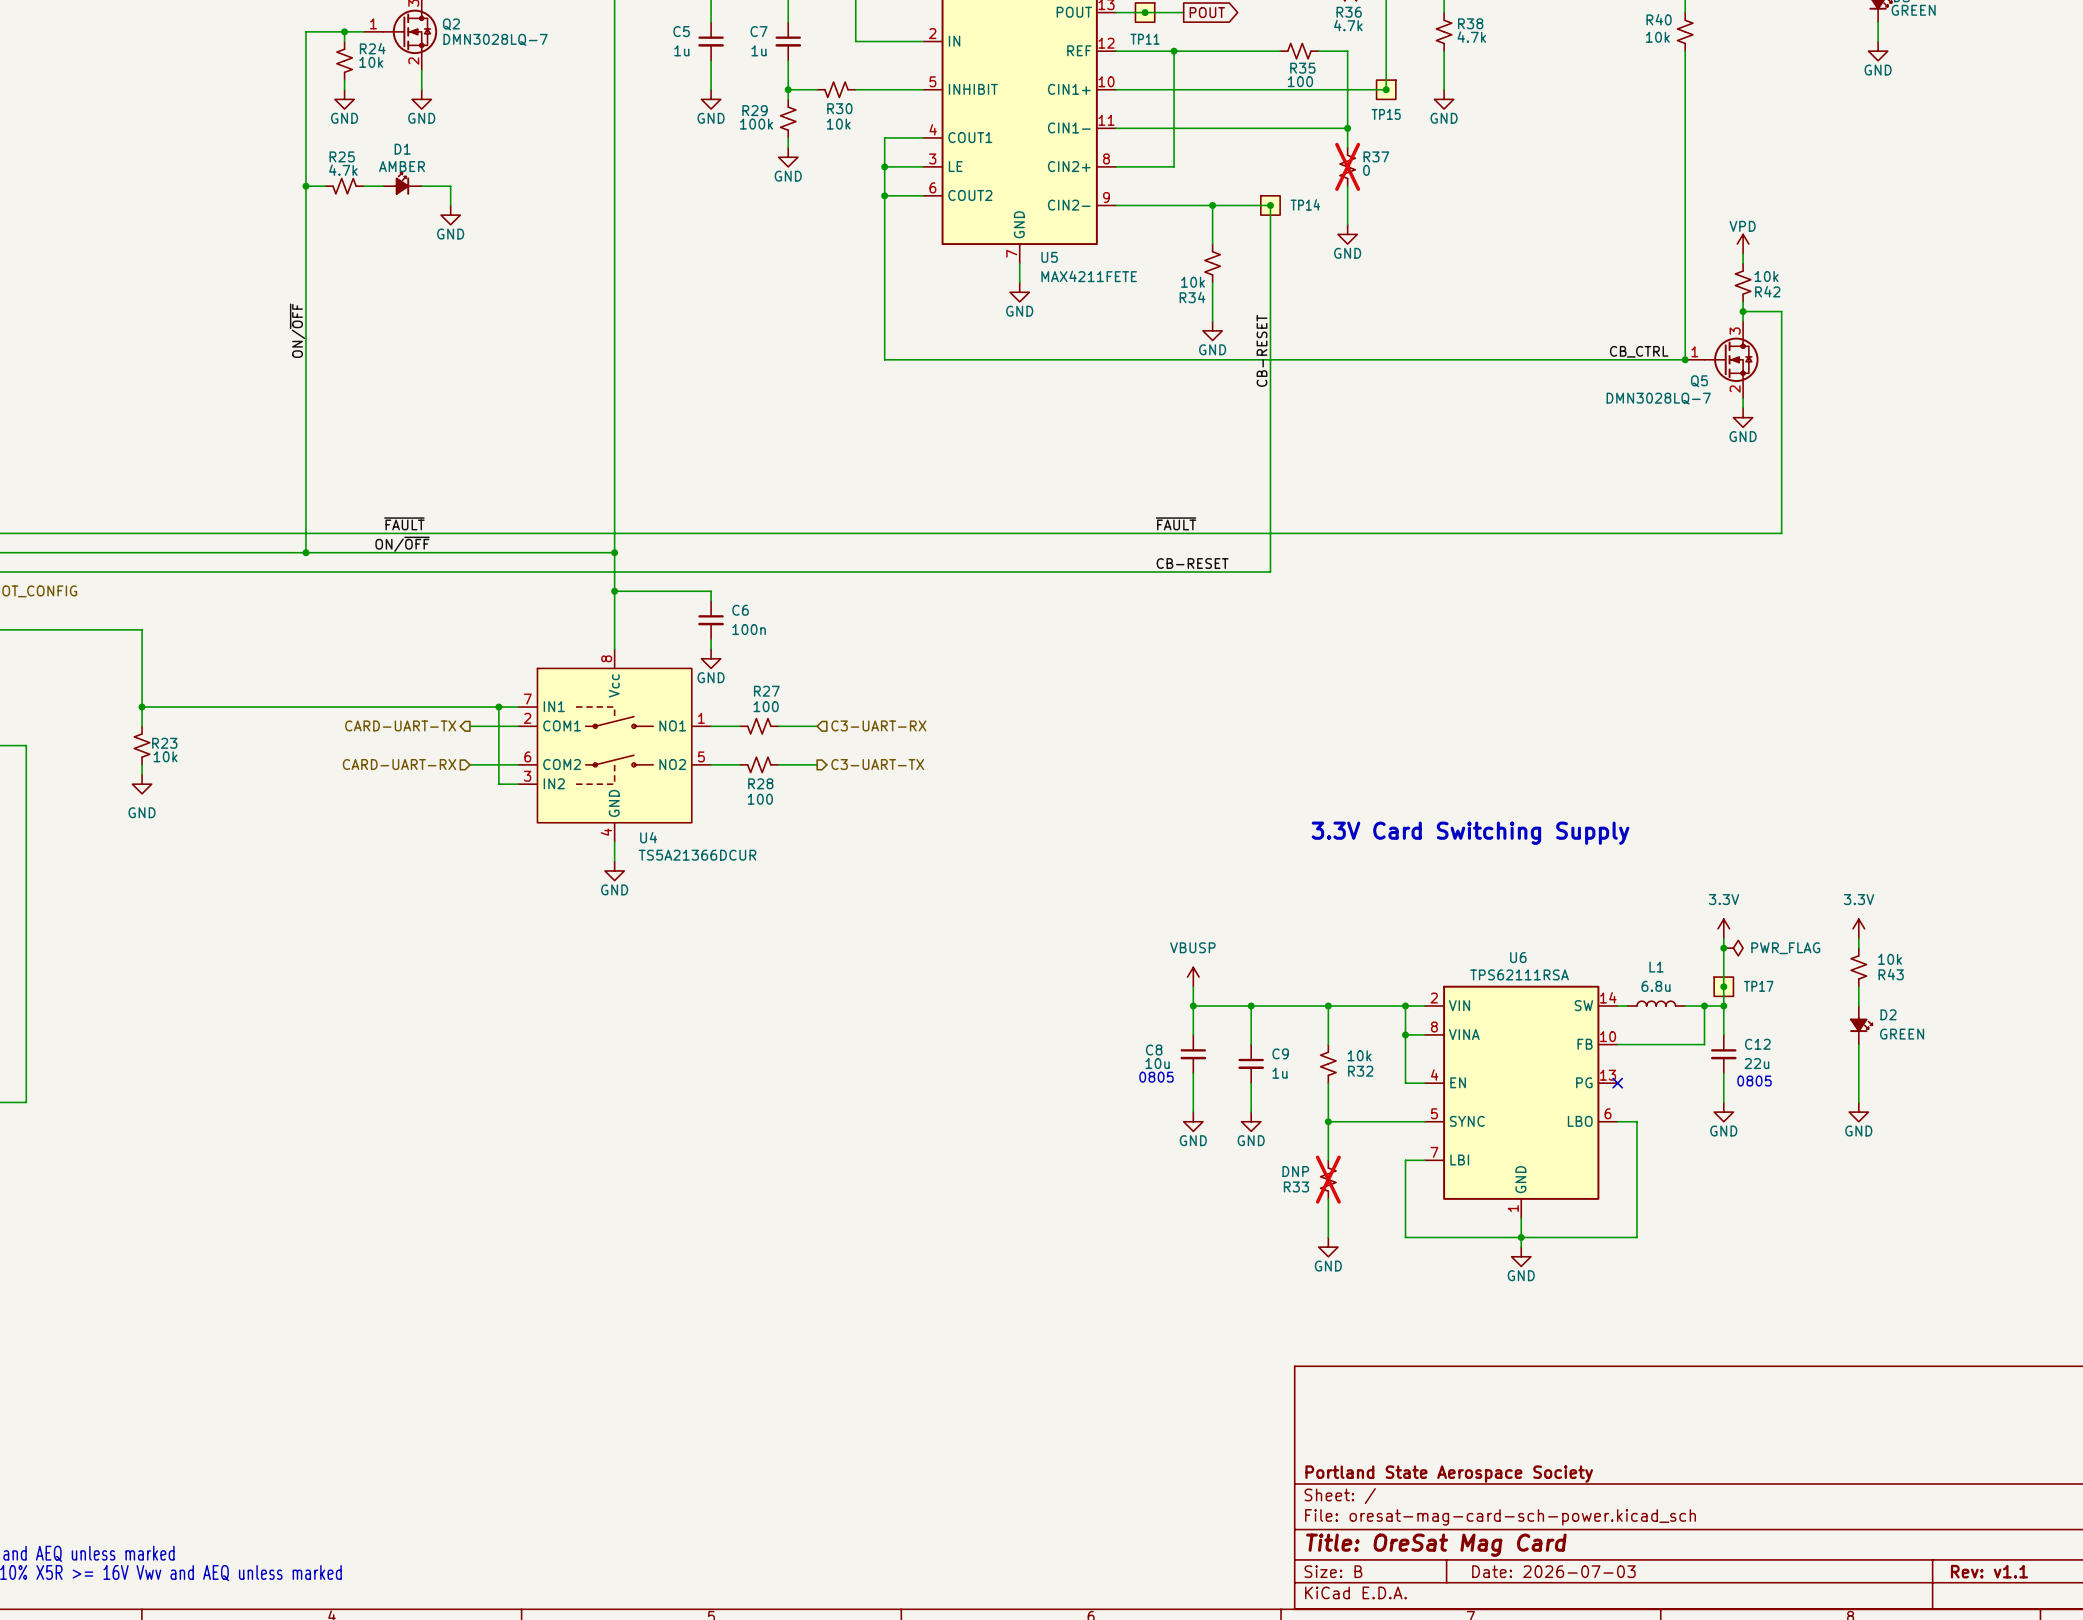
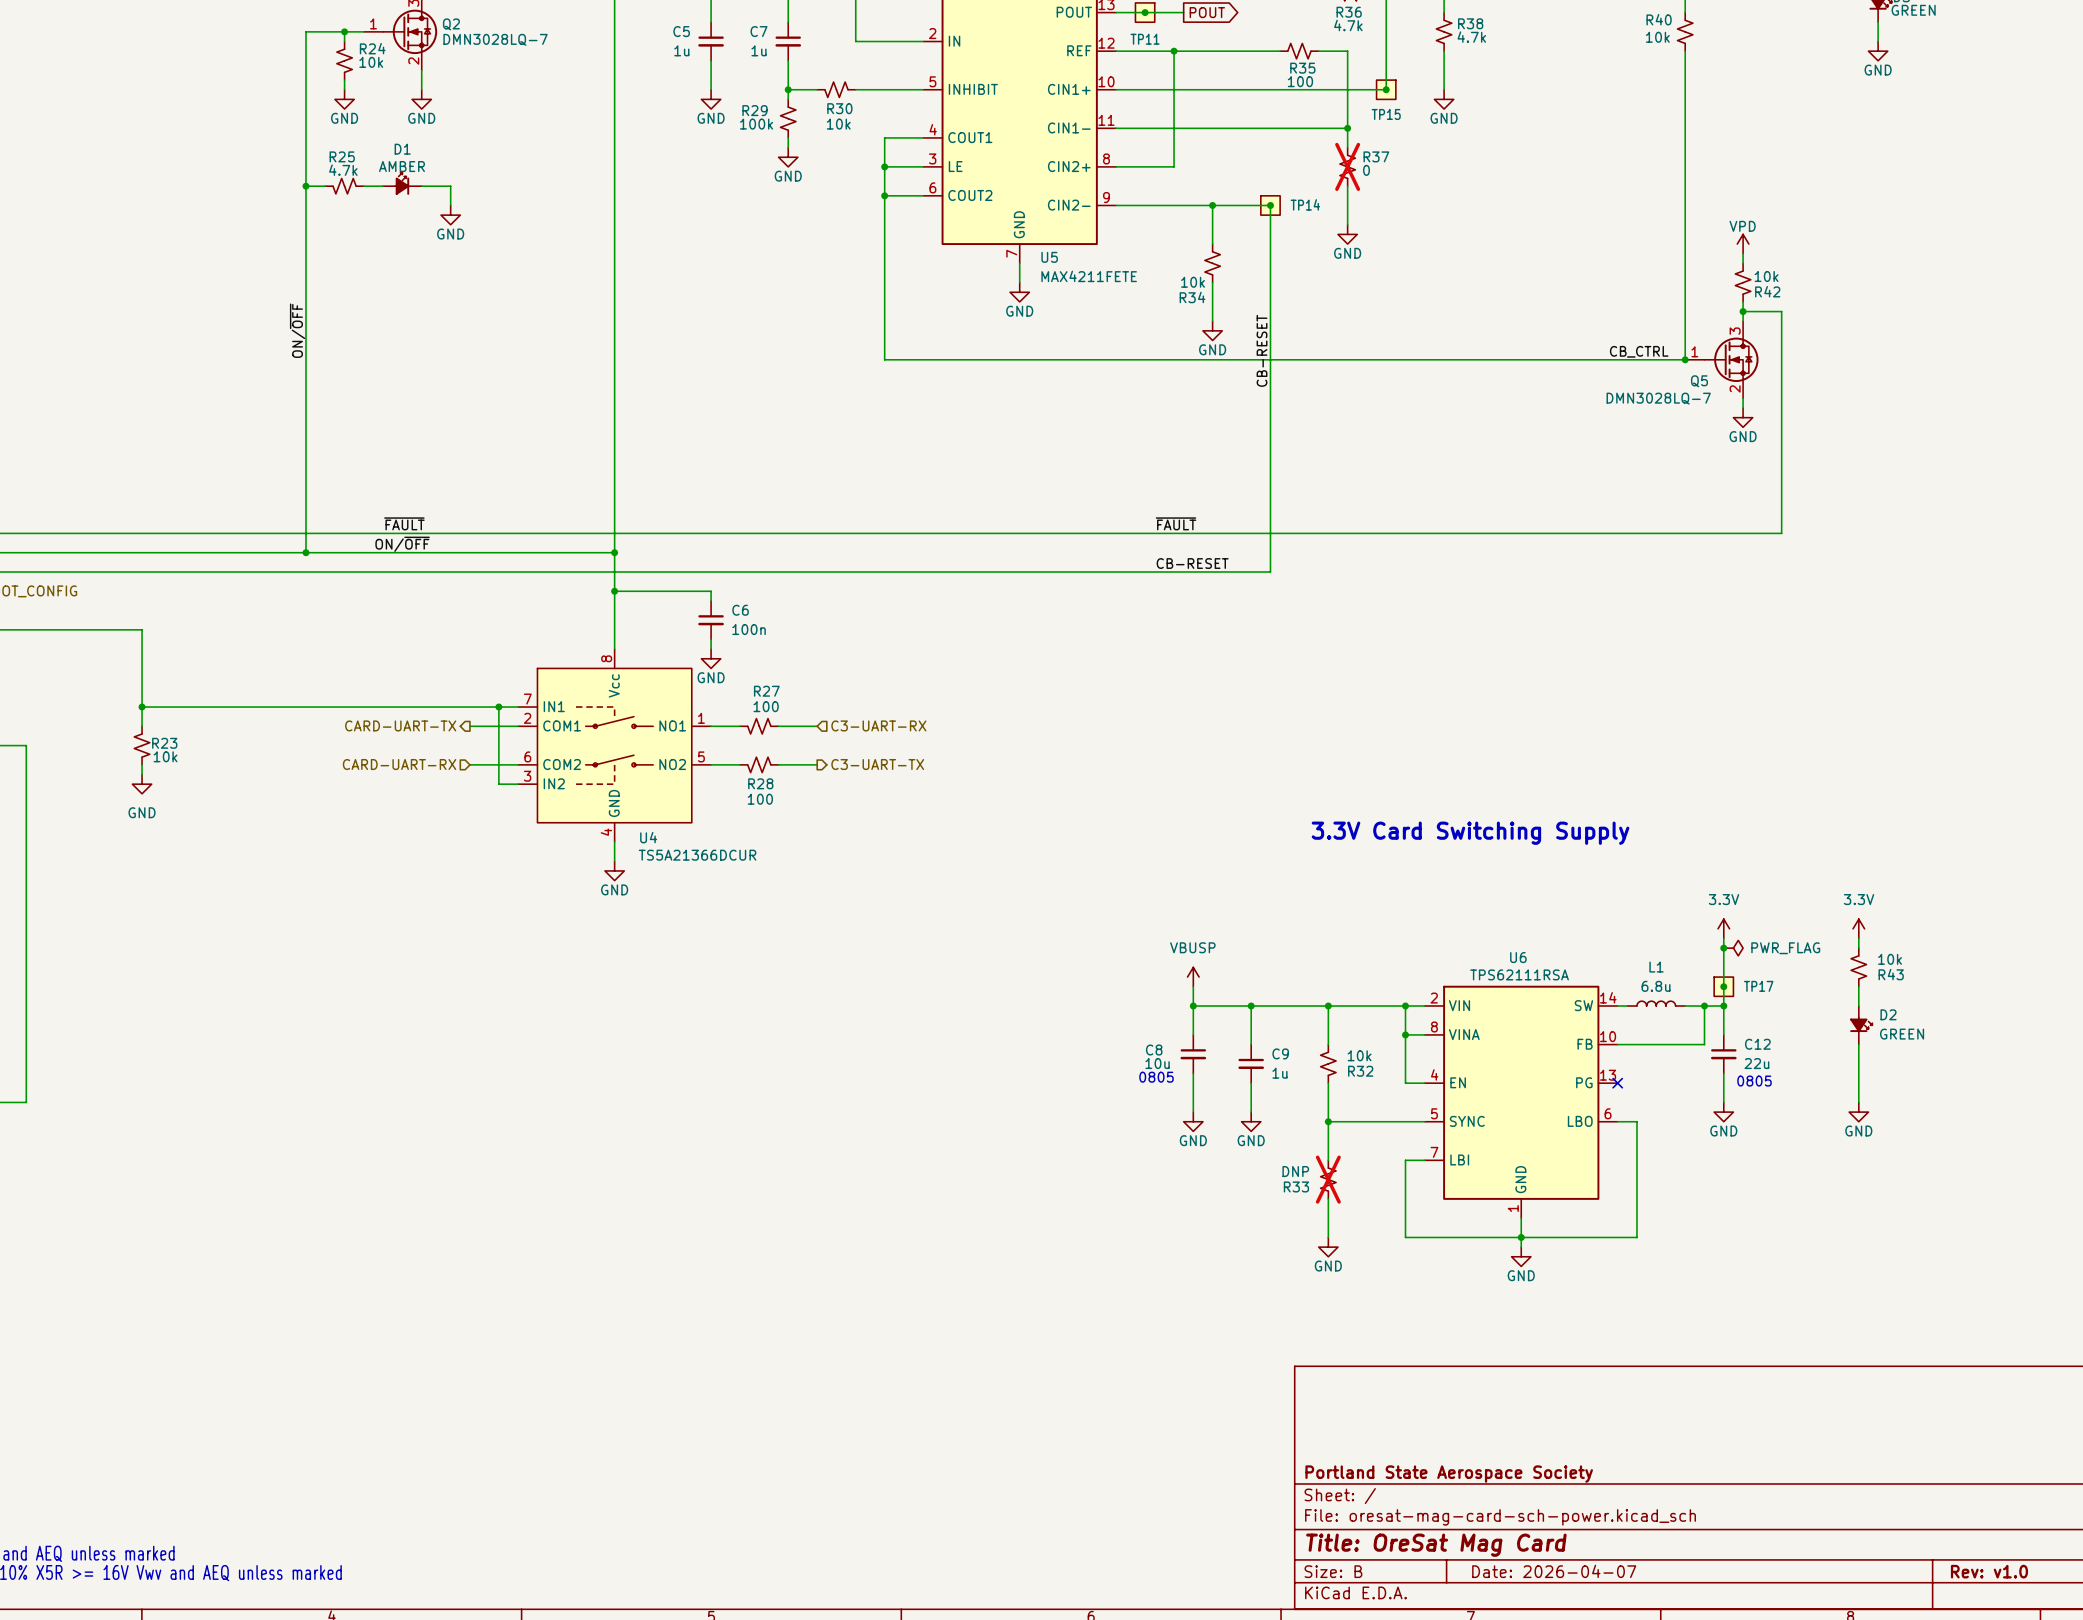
title block: Date: 2026-07-03 (1553, 1571) -> Date: 2026-04-07 (1554, 1571)
title block: Rev: v1.1 (1989, 1571) -> Rev: v1.0 (1989, 1571)

